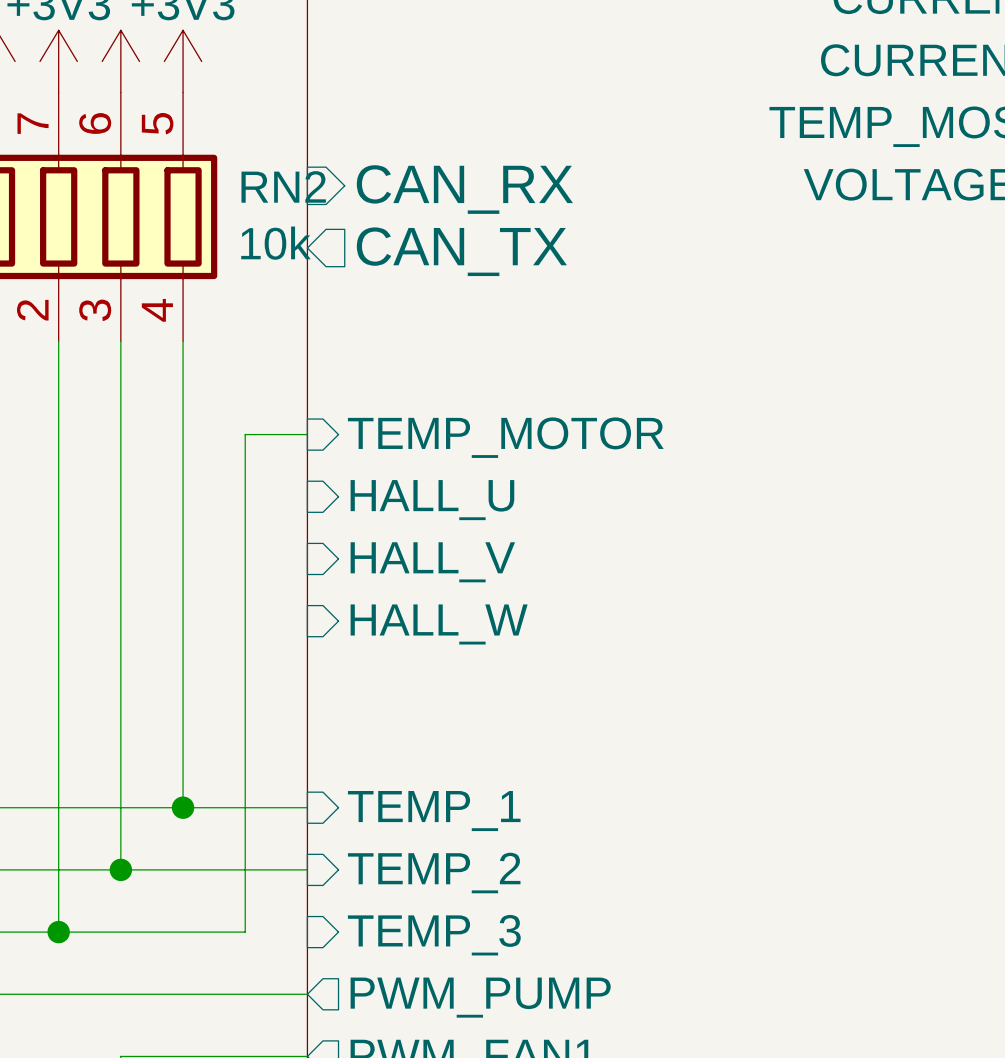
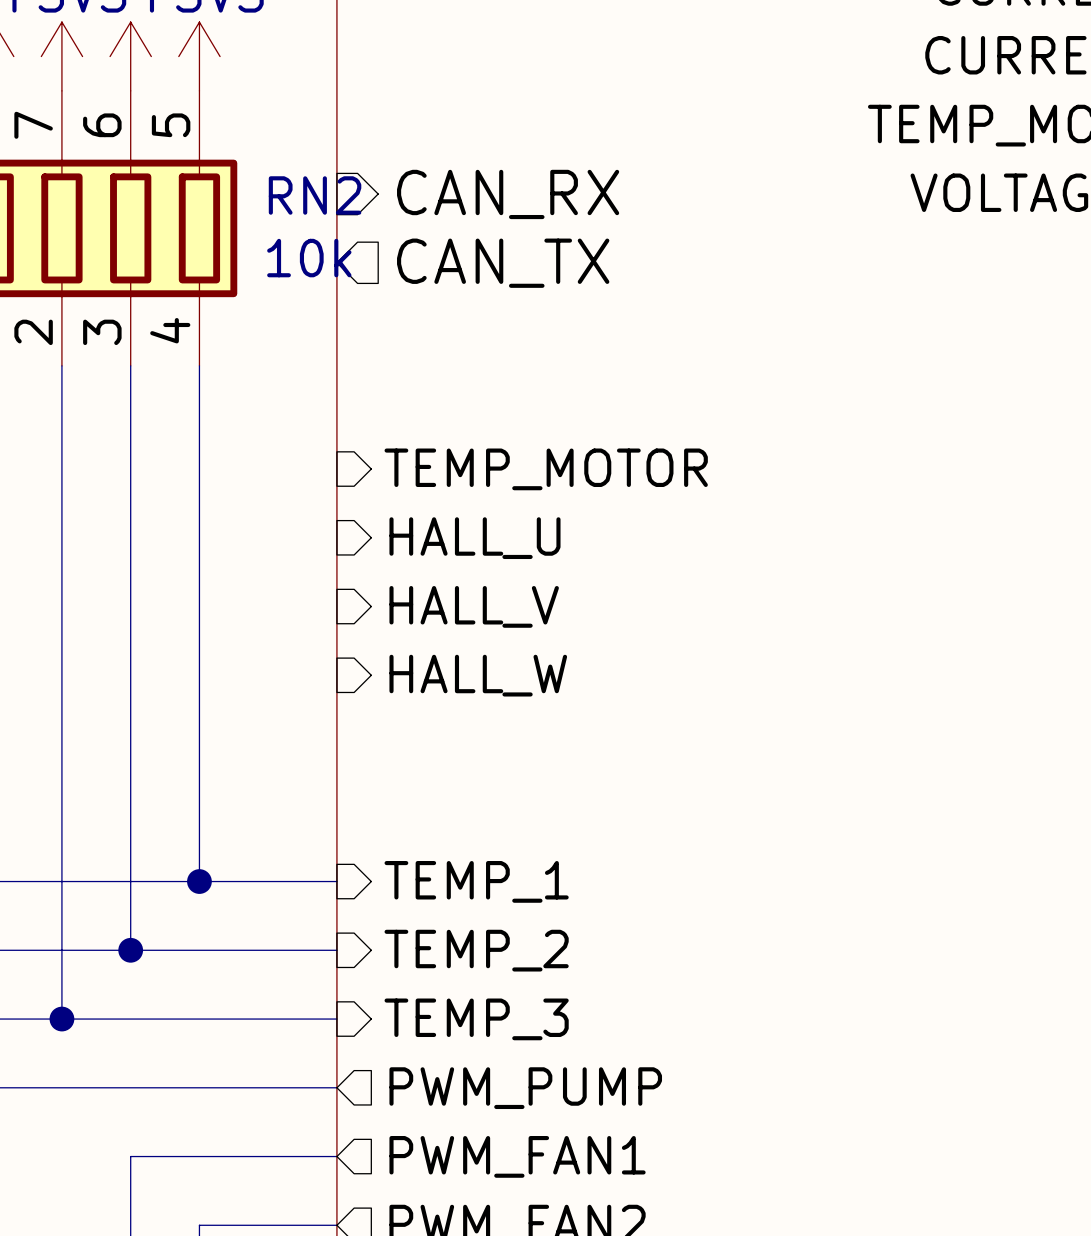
wire: (307, 434) (245, 434) (245, 932) -> (336, 1019) (268, 1019)

